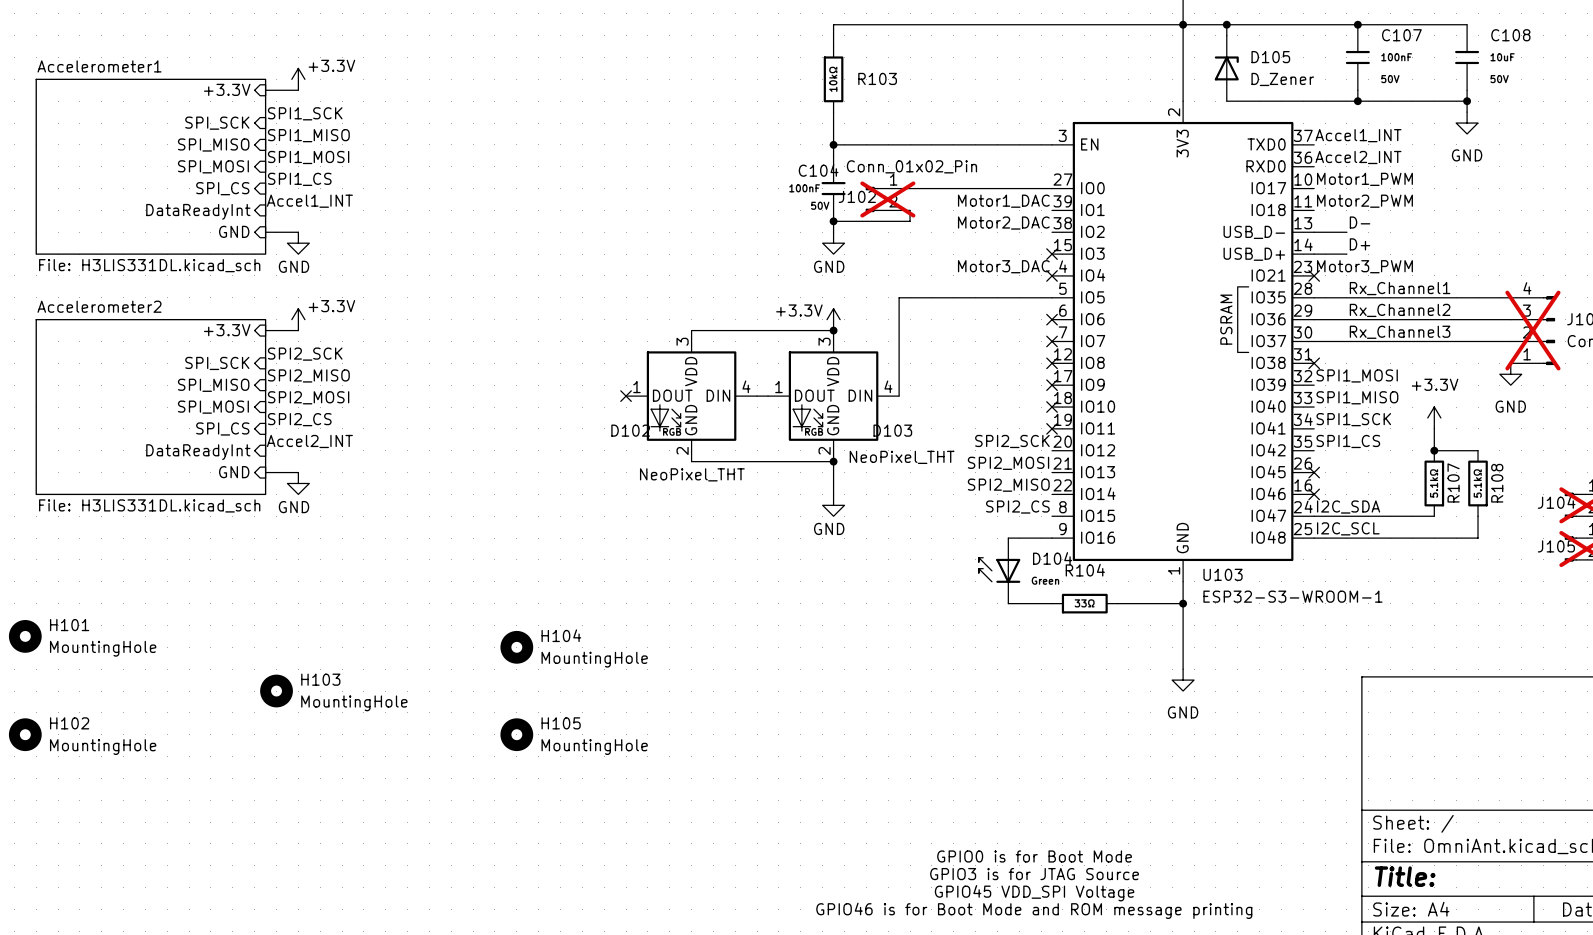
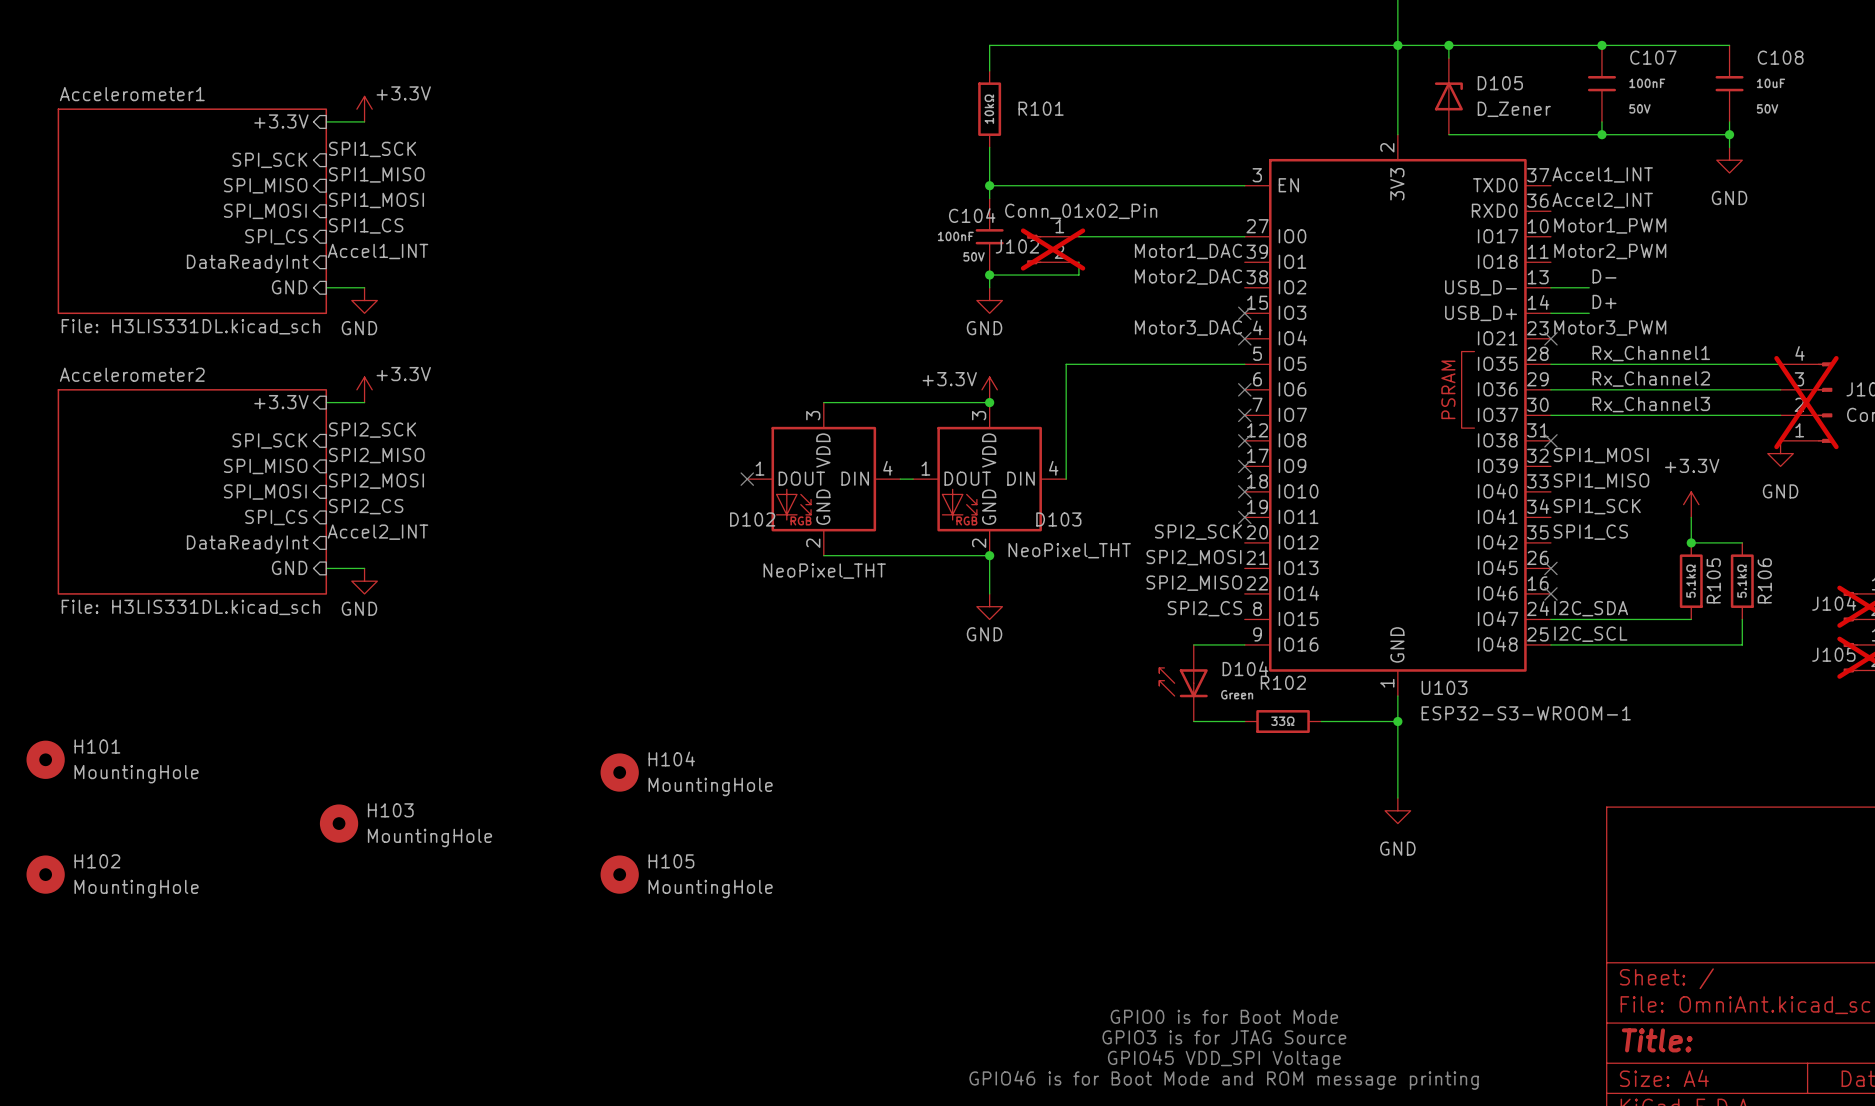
R103 name: R103 (877, 78) -> R101 (1041, 108)
R107 name: R107 (1453, 482) -> R105 (1713, 580)
R108 name: R108 (1497, 483) -> R106 (1764, 580)
R104 name: R104 (1085, 570) -> R102 (1283, 682)

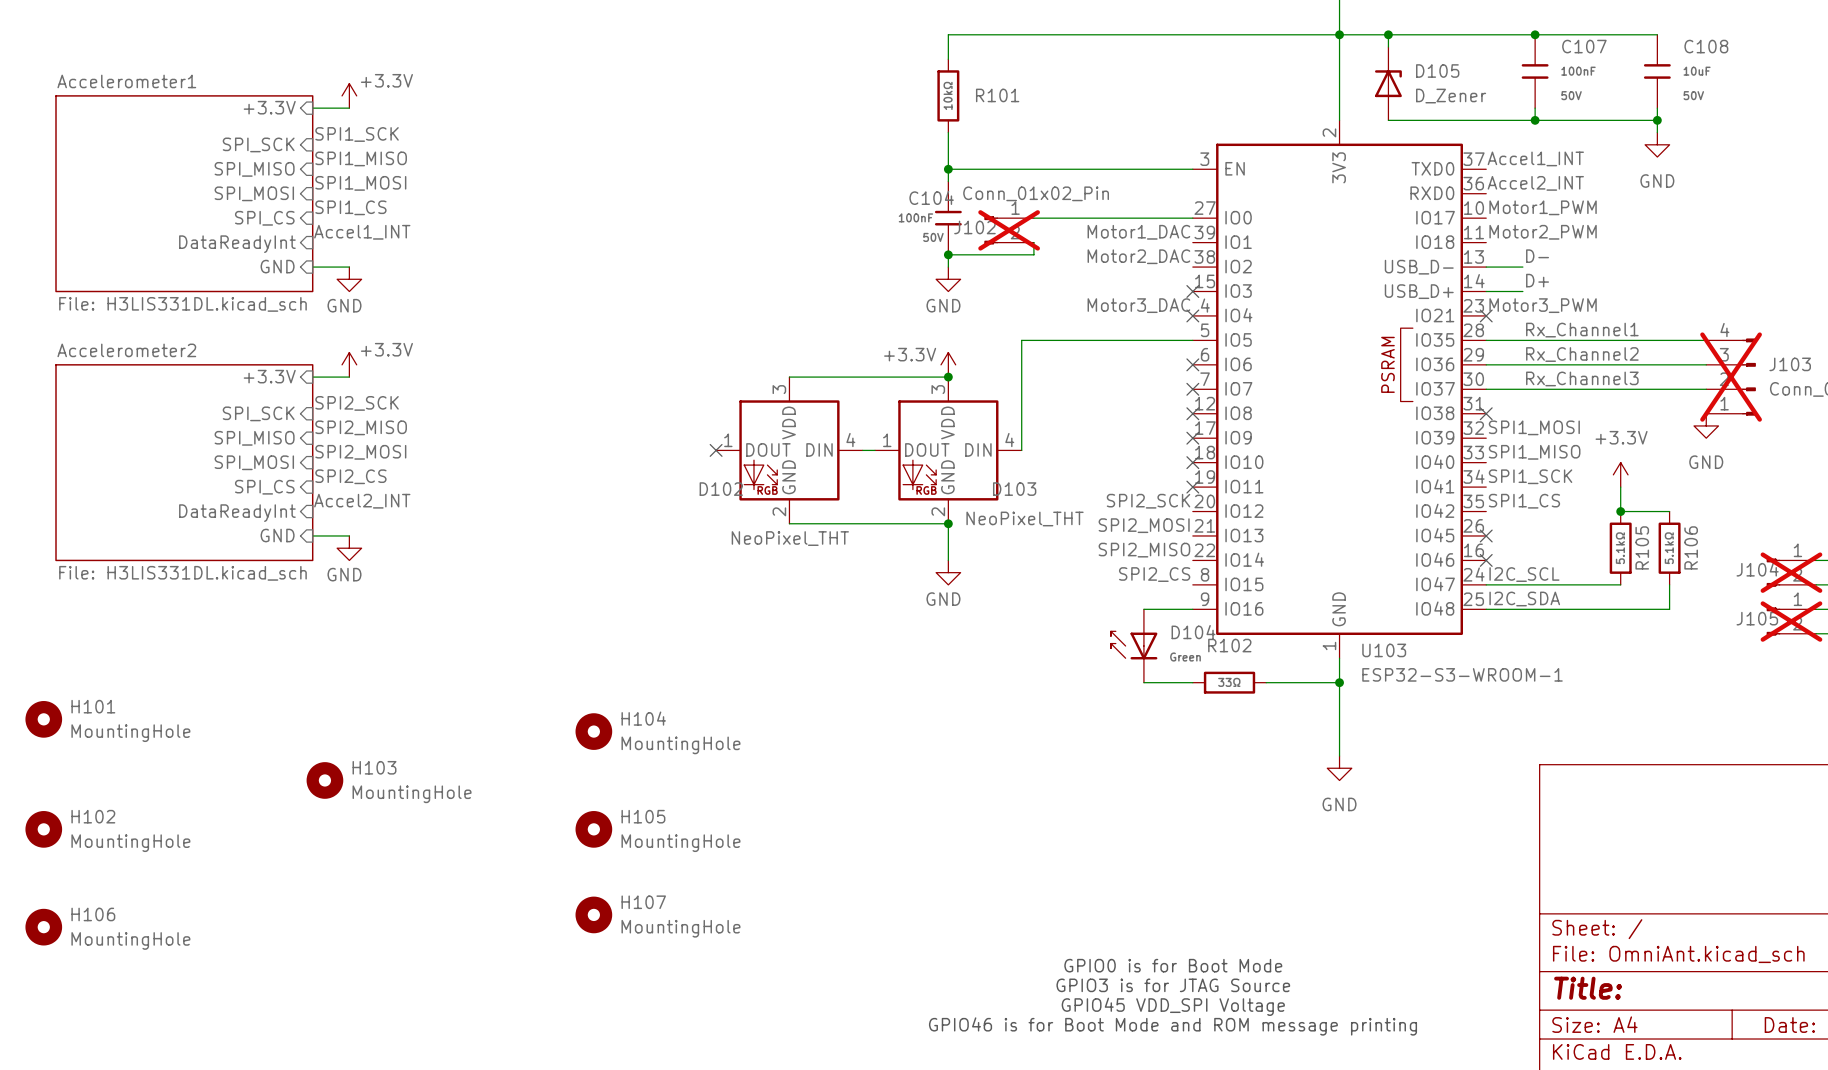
label: I2C_SDA (1591, 608) -> I2C_SCL (1524, 574)
label: I2C_SCL (1590, 634) -> I2C_SDA (1524, 599)
H107: none -> MountingHole (593, 914)
H106: none -> MountingHole (43, 927)

